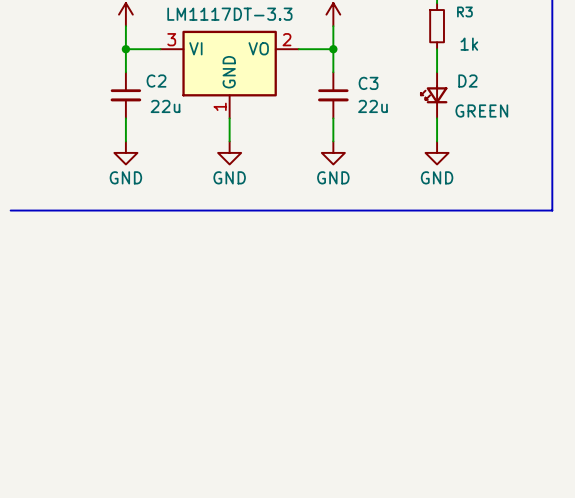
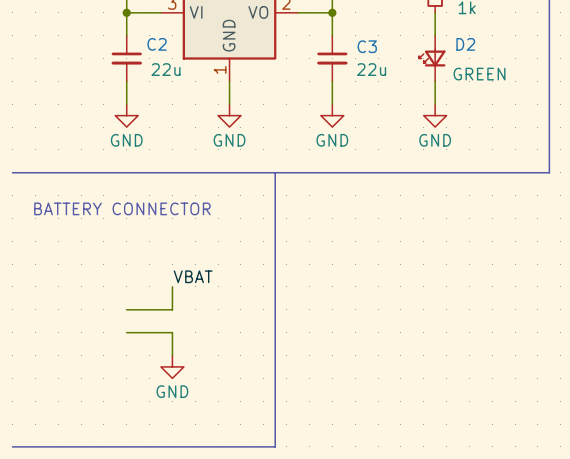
line: none -> (275, 172) (275, 446) (12, 446)
text: none -> BATTERY CONNECTOR (122, 208)
label: none -> VBAT (193, 276)
wire: none -> (172, 286) (172, 309) (126, 309)
wire: none -> (126, 332) (172, 332) (172, 355)
power symbol: none -> GND (172, 366)

